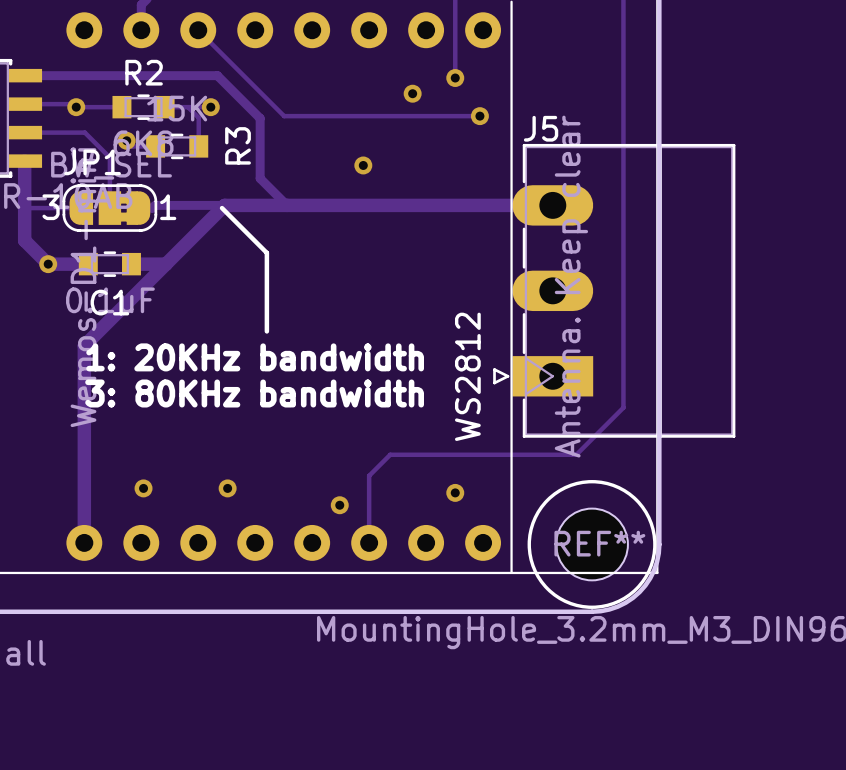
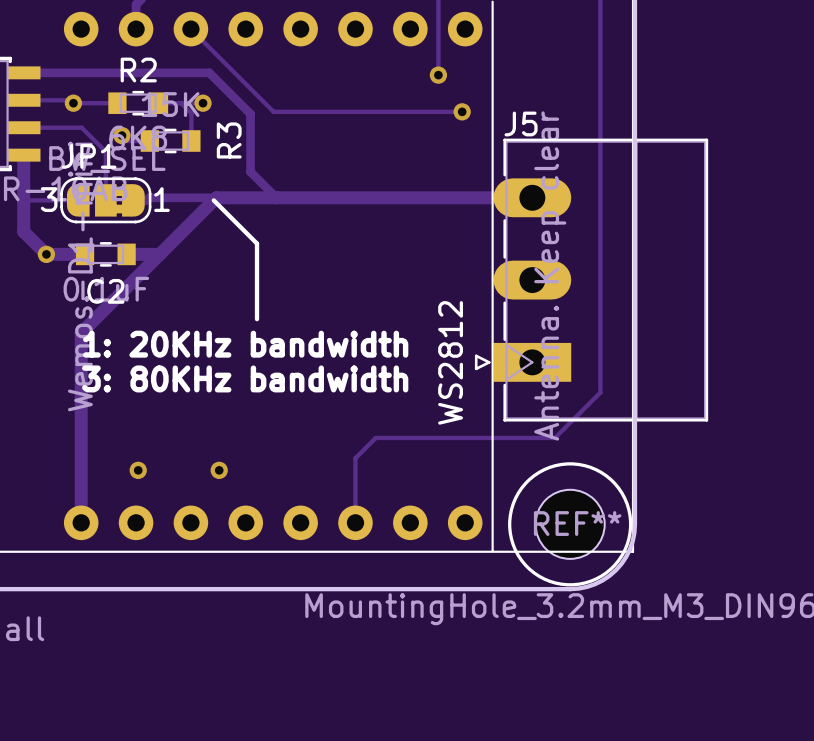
via: (412, 93) -> none
via: (363, 165) -> none
C1 name: C1 (109, 302) -> C2 (105, 291)
via: (455, 492) -> none
via: (339, 505) -> none

